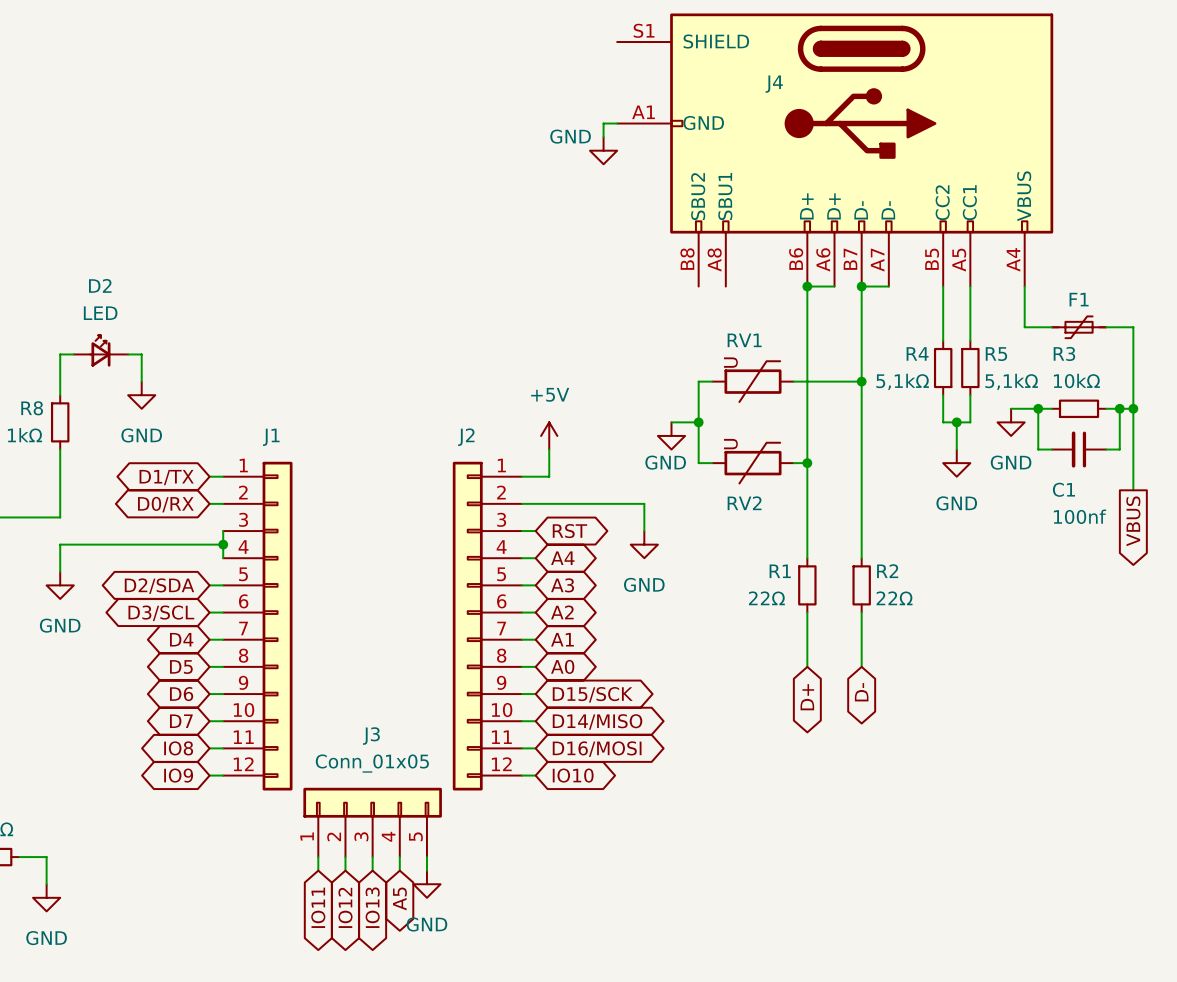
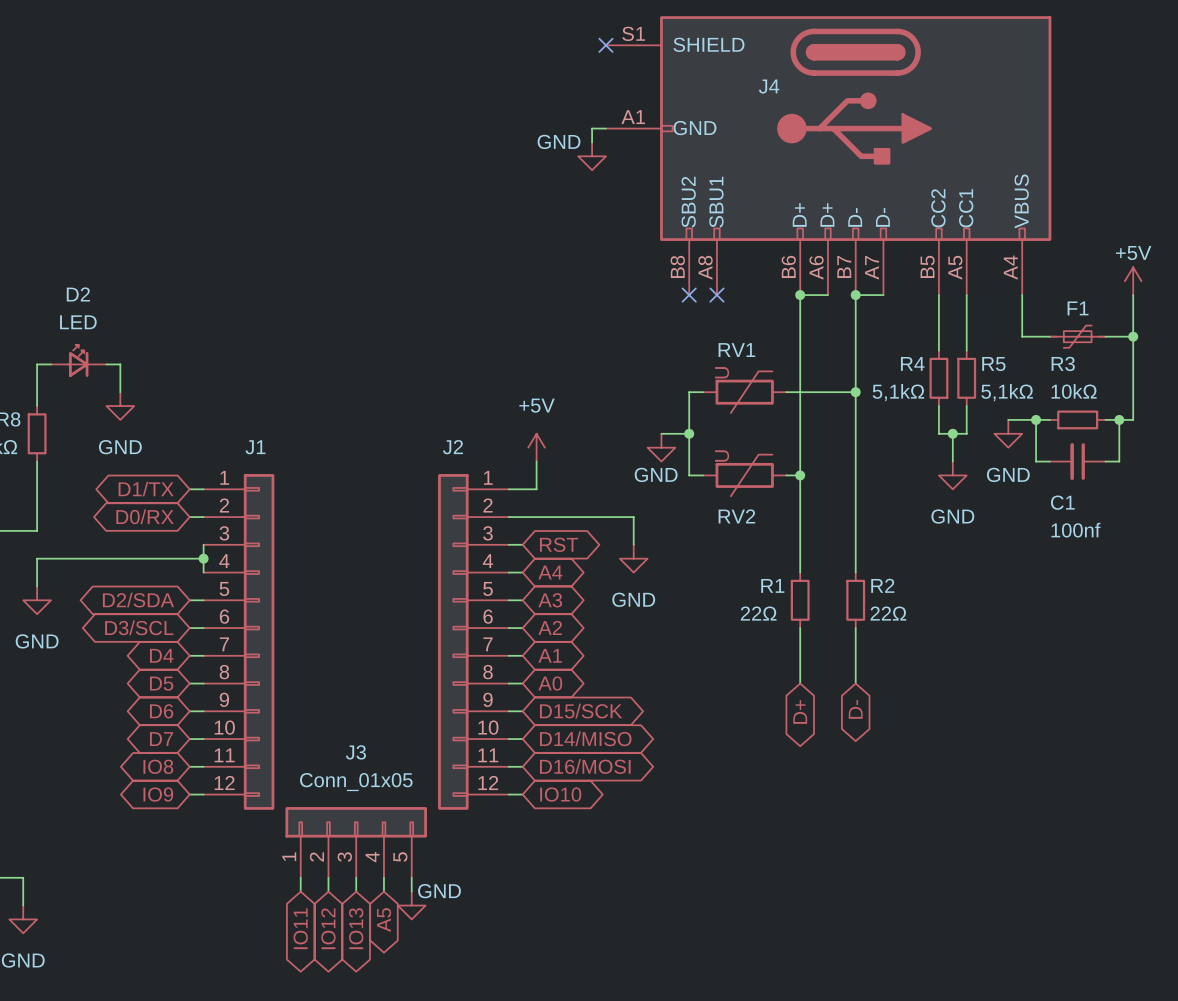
no-connect mark: none -> (605, 45)
power symbol: none -> +5V (1133, 281)
no-connect mark: none -> (689, 295)
no-connect mark: none -> (716, 295)
wire: none -> (1133, 295) (1133, 336)
junction: none -> (1133, 336)
wire: (1133, 408) (1133, 490) -> none
junction: (1133, 408) -> none
global label: VBUS (1133, 521) -> none
power symbol text position: GND (426, 924) -> GND (439, 891)

